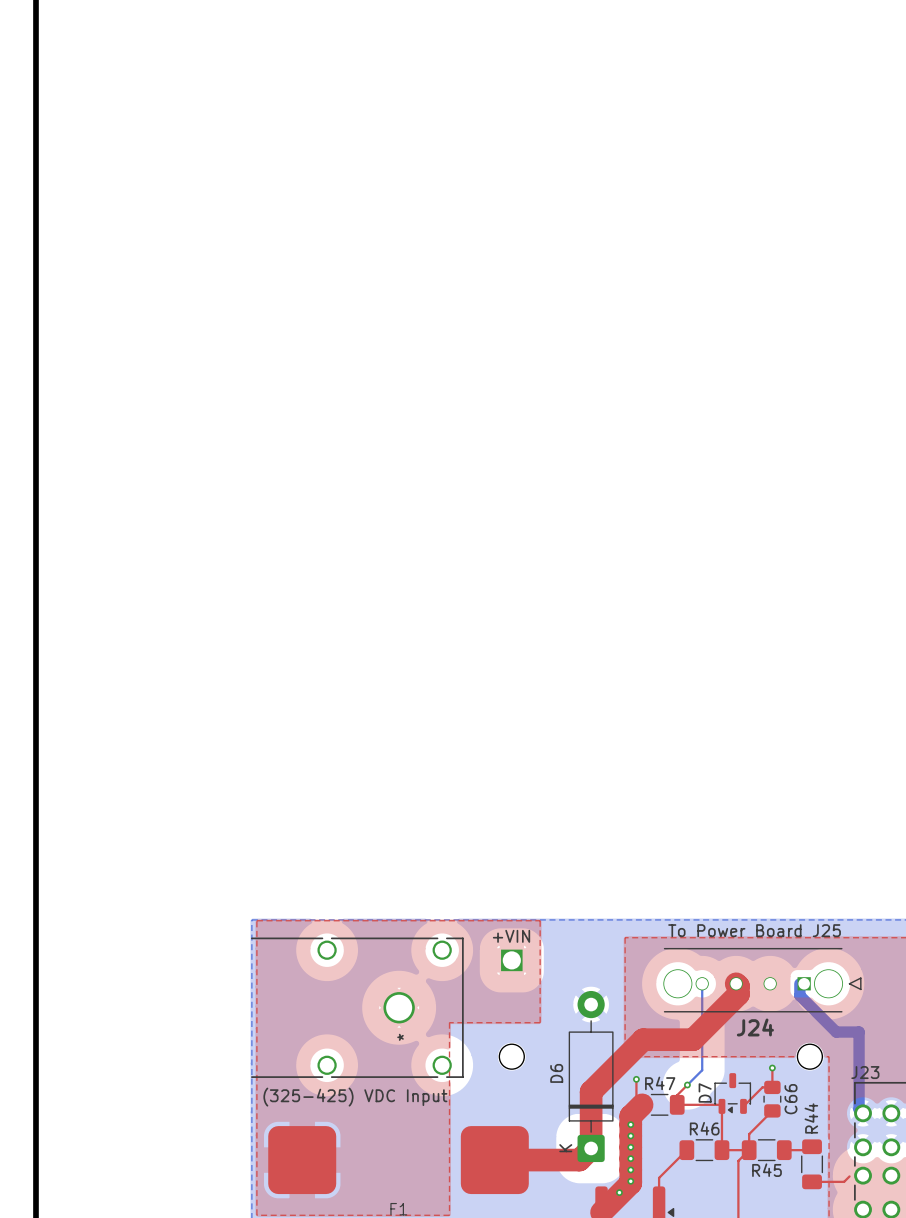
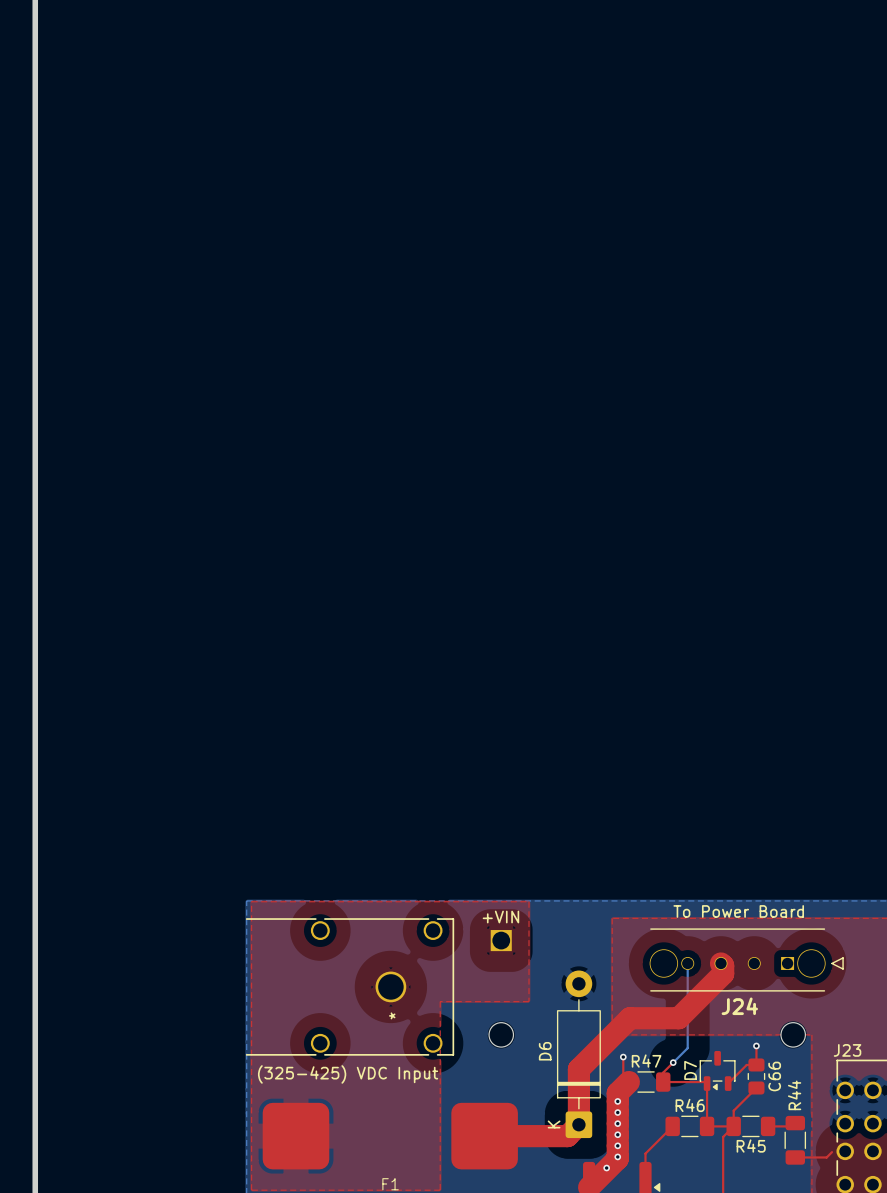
text: To Power Board J25 (754, 930) -> To Power Board (738, 911)
bottom track: (799, 983) (799, 995) (836, 1032) (859, 1032) (859, 1109) (863, 1113) -> none

